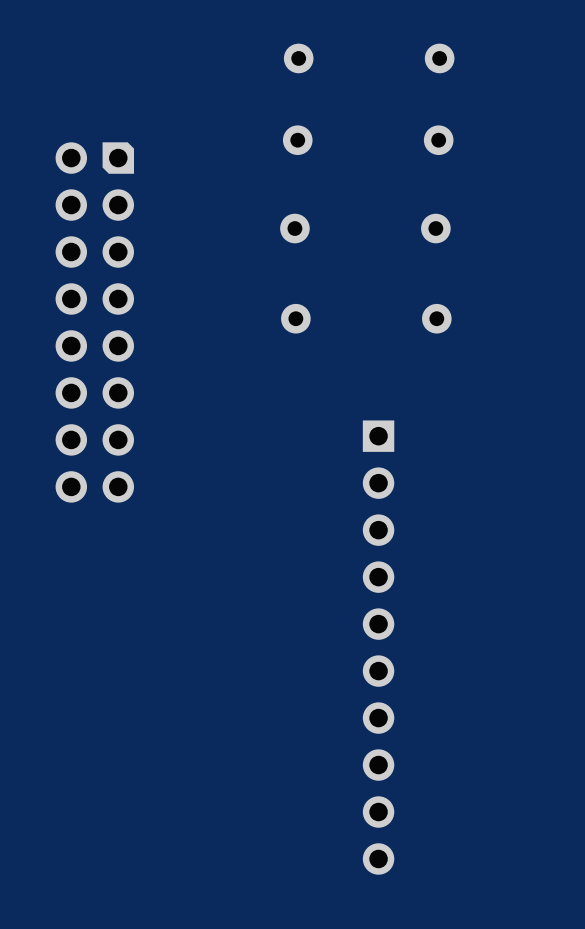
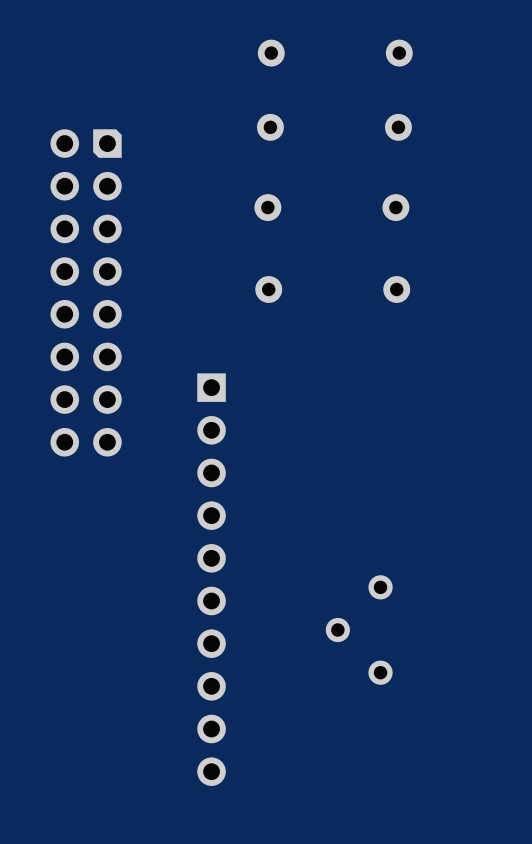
part position: (378, 647) -> (211, 579)
part: none -> (359, 630)

